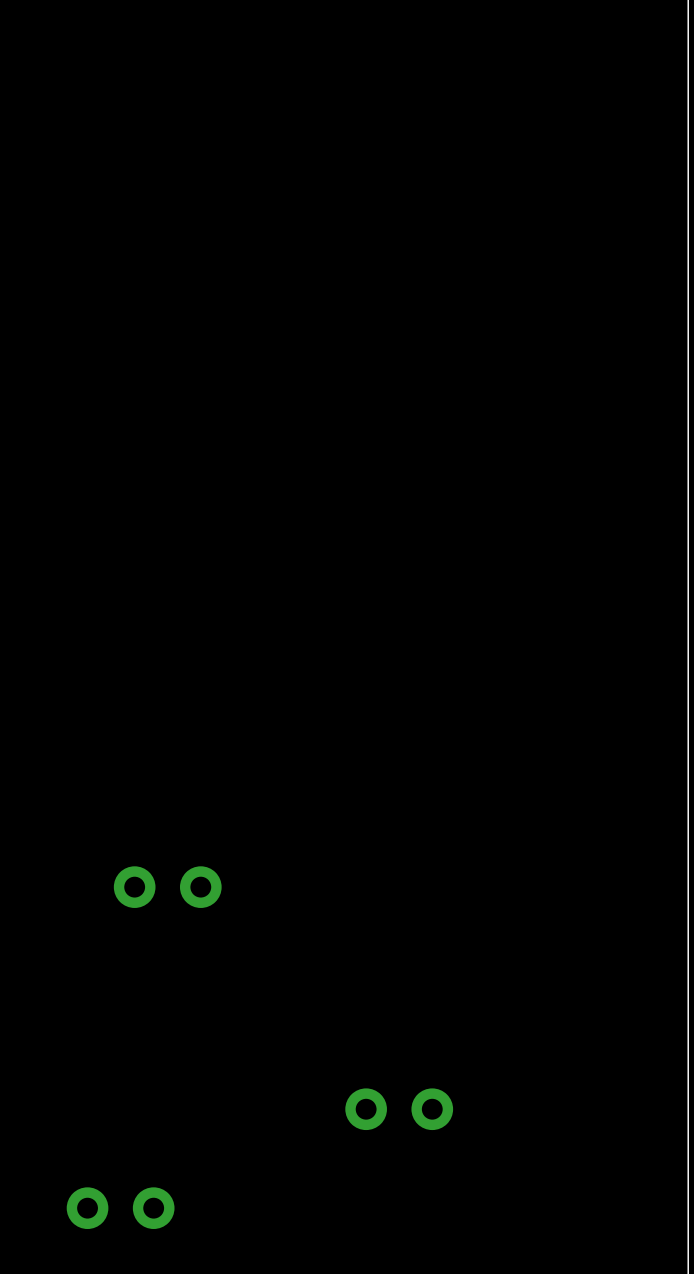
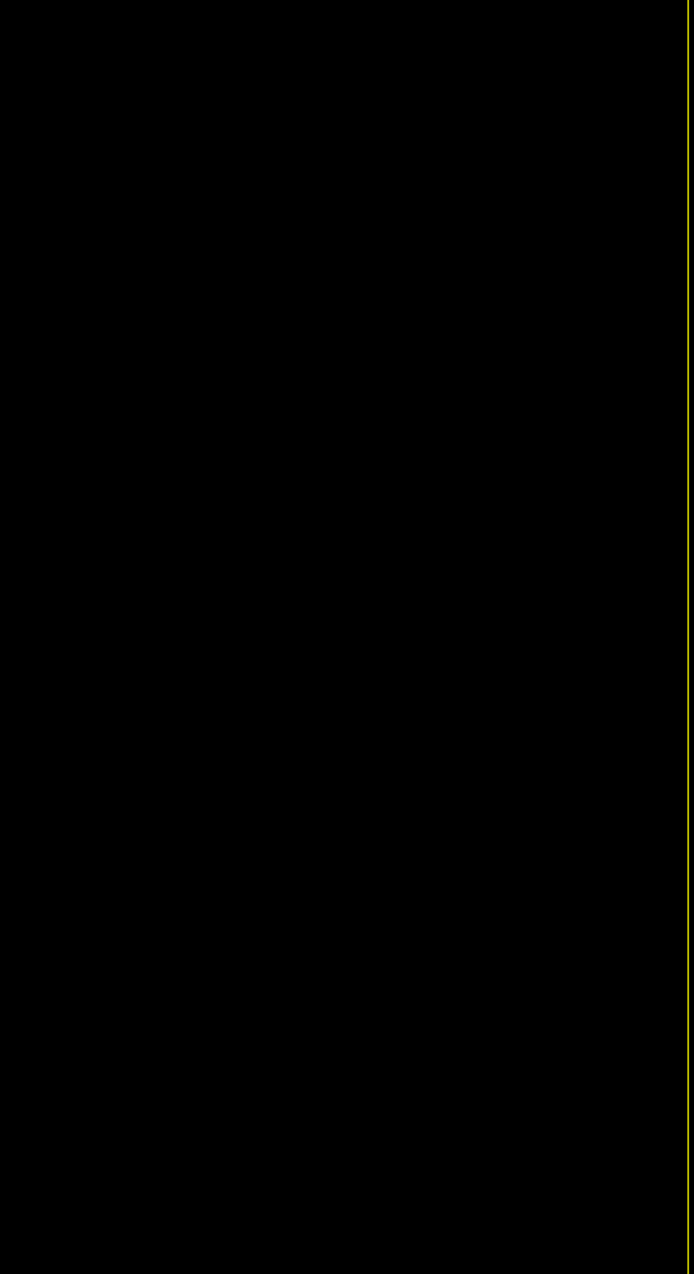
part: (167, 887) -> none
part: (399, 1109) -> none
part: (120, 1208) -> none

